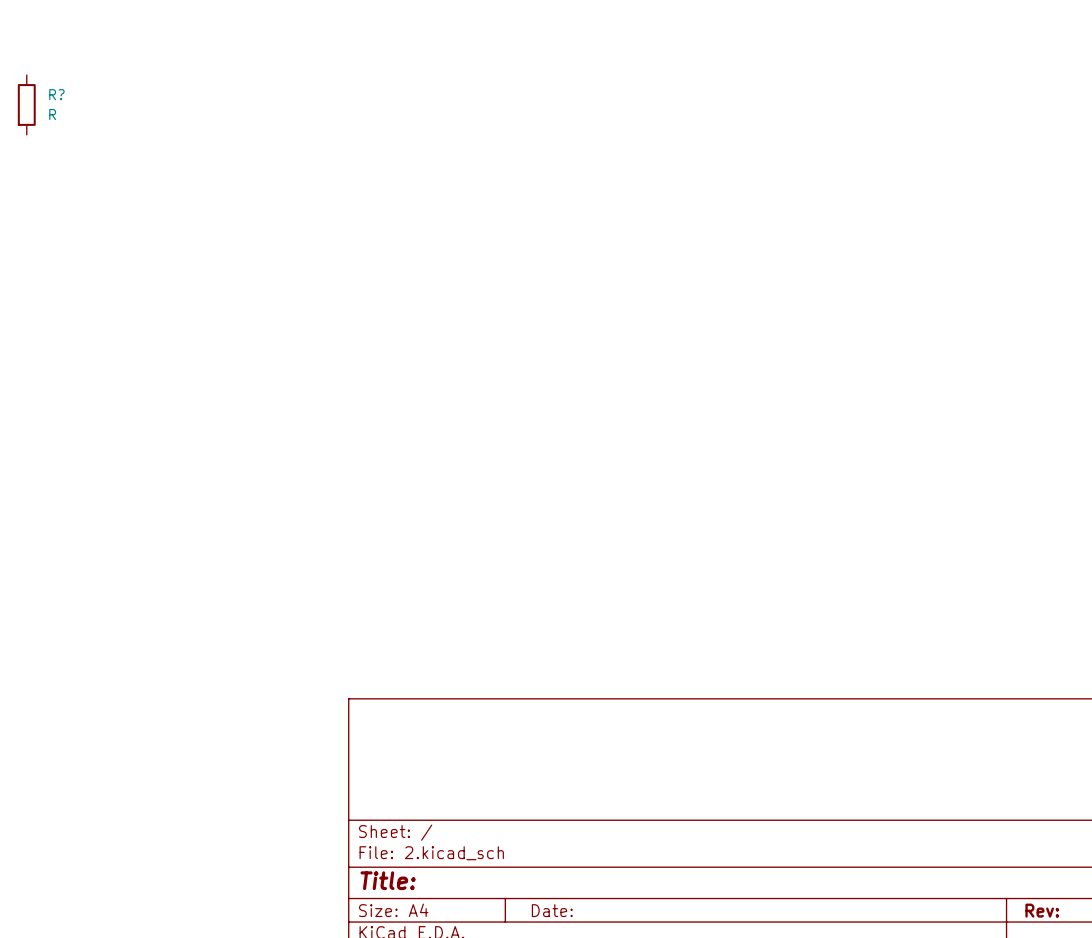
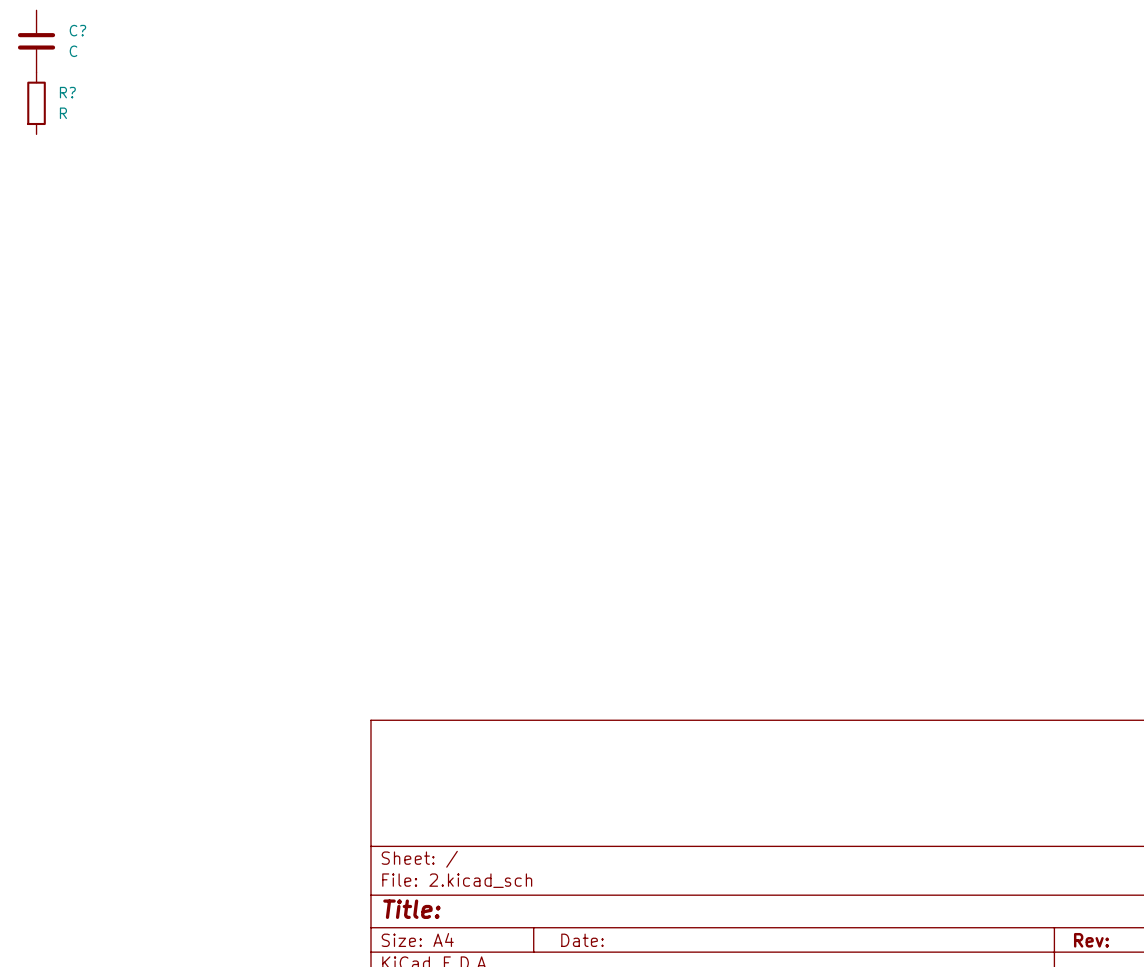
C?: none -> C (36, 41)

